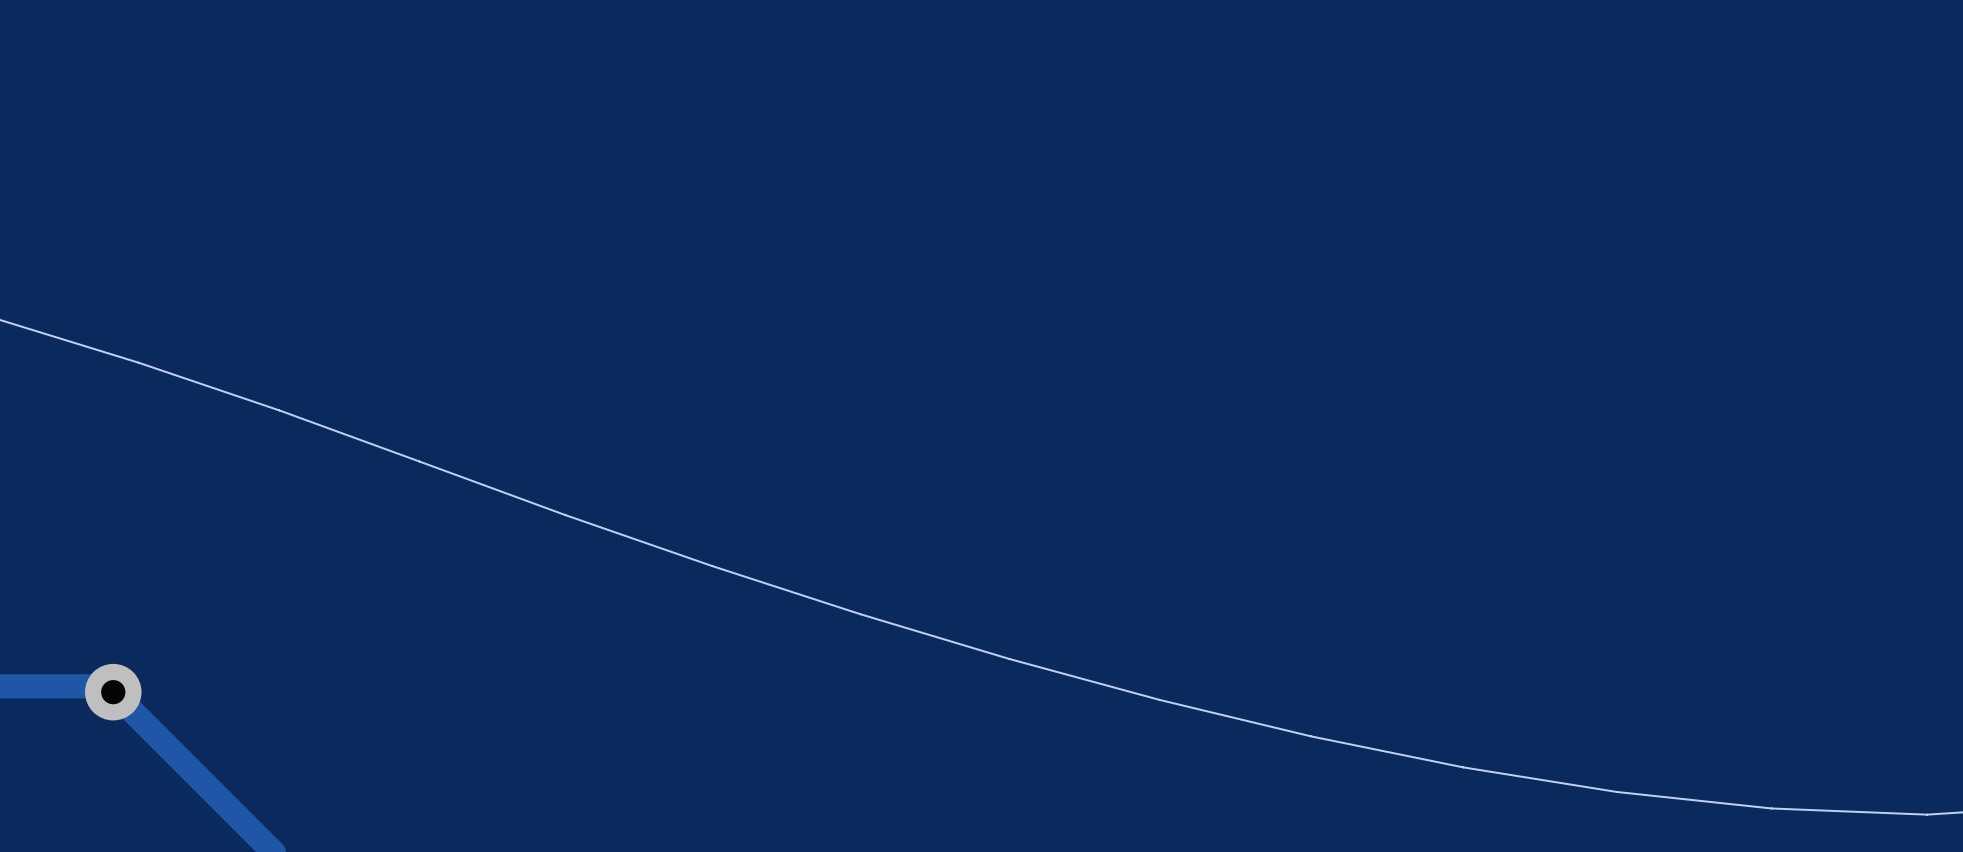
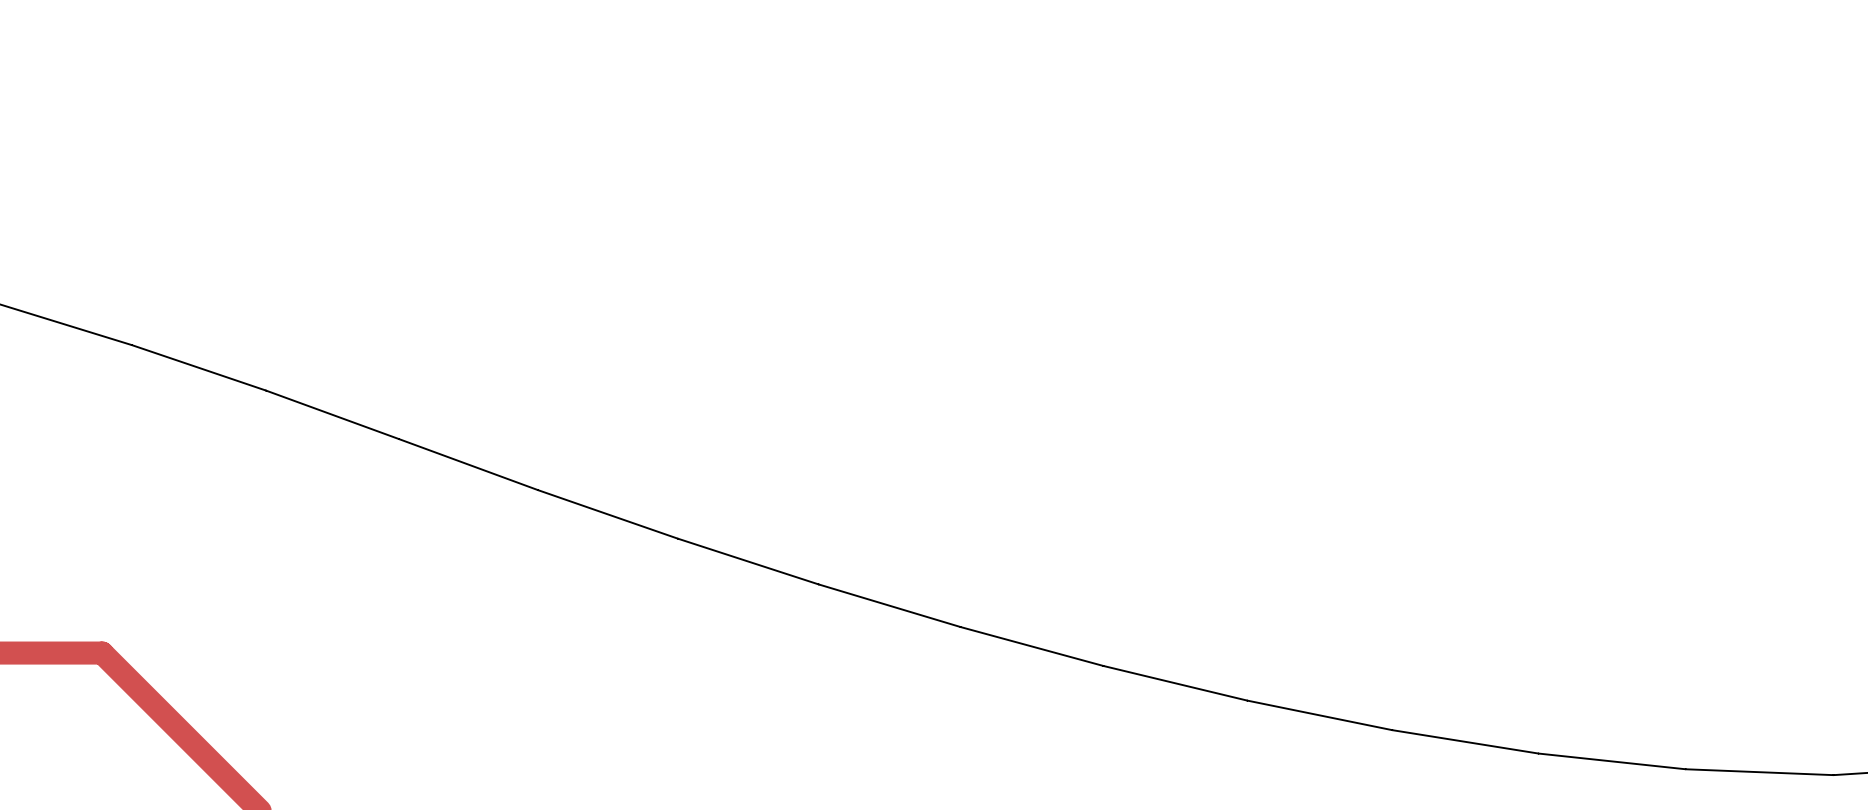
via: (113, 692) -> none

